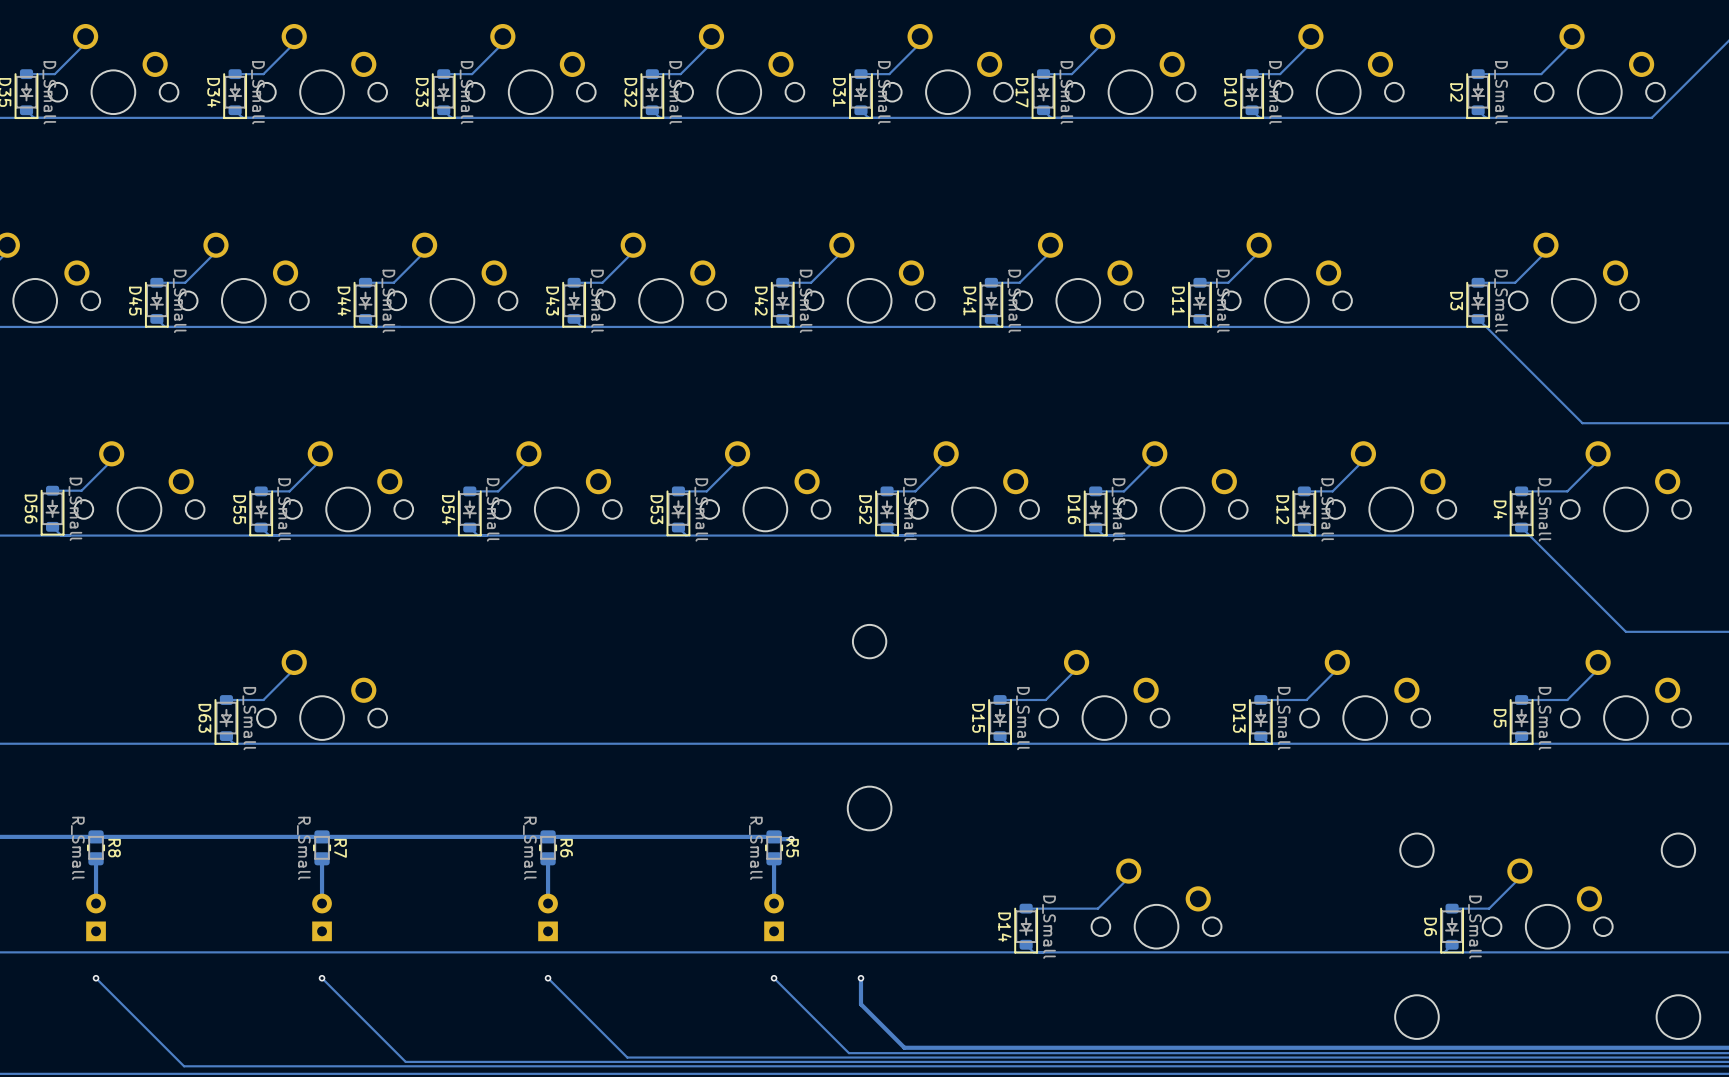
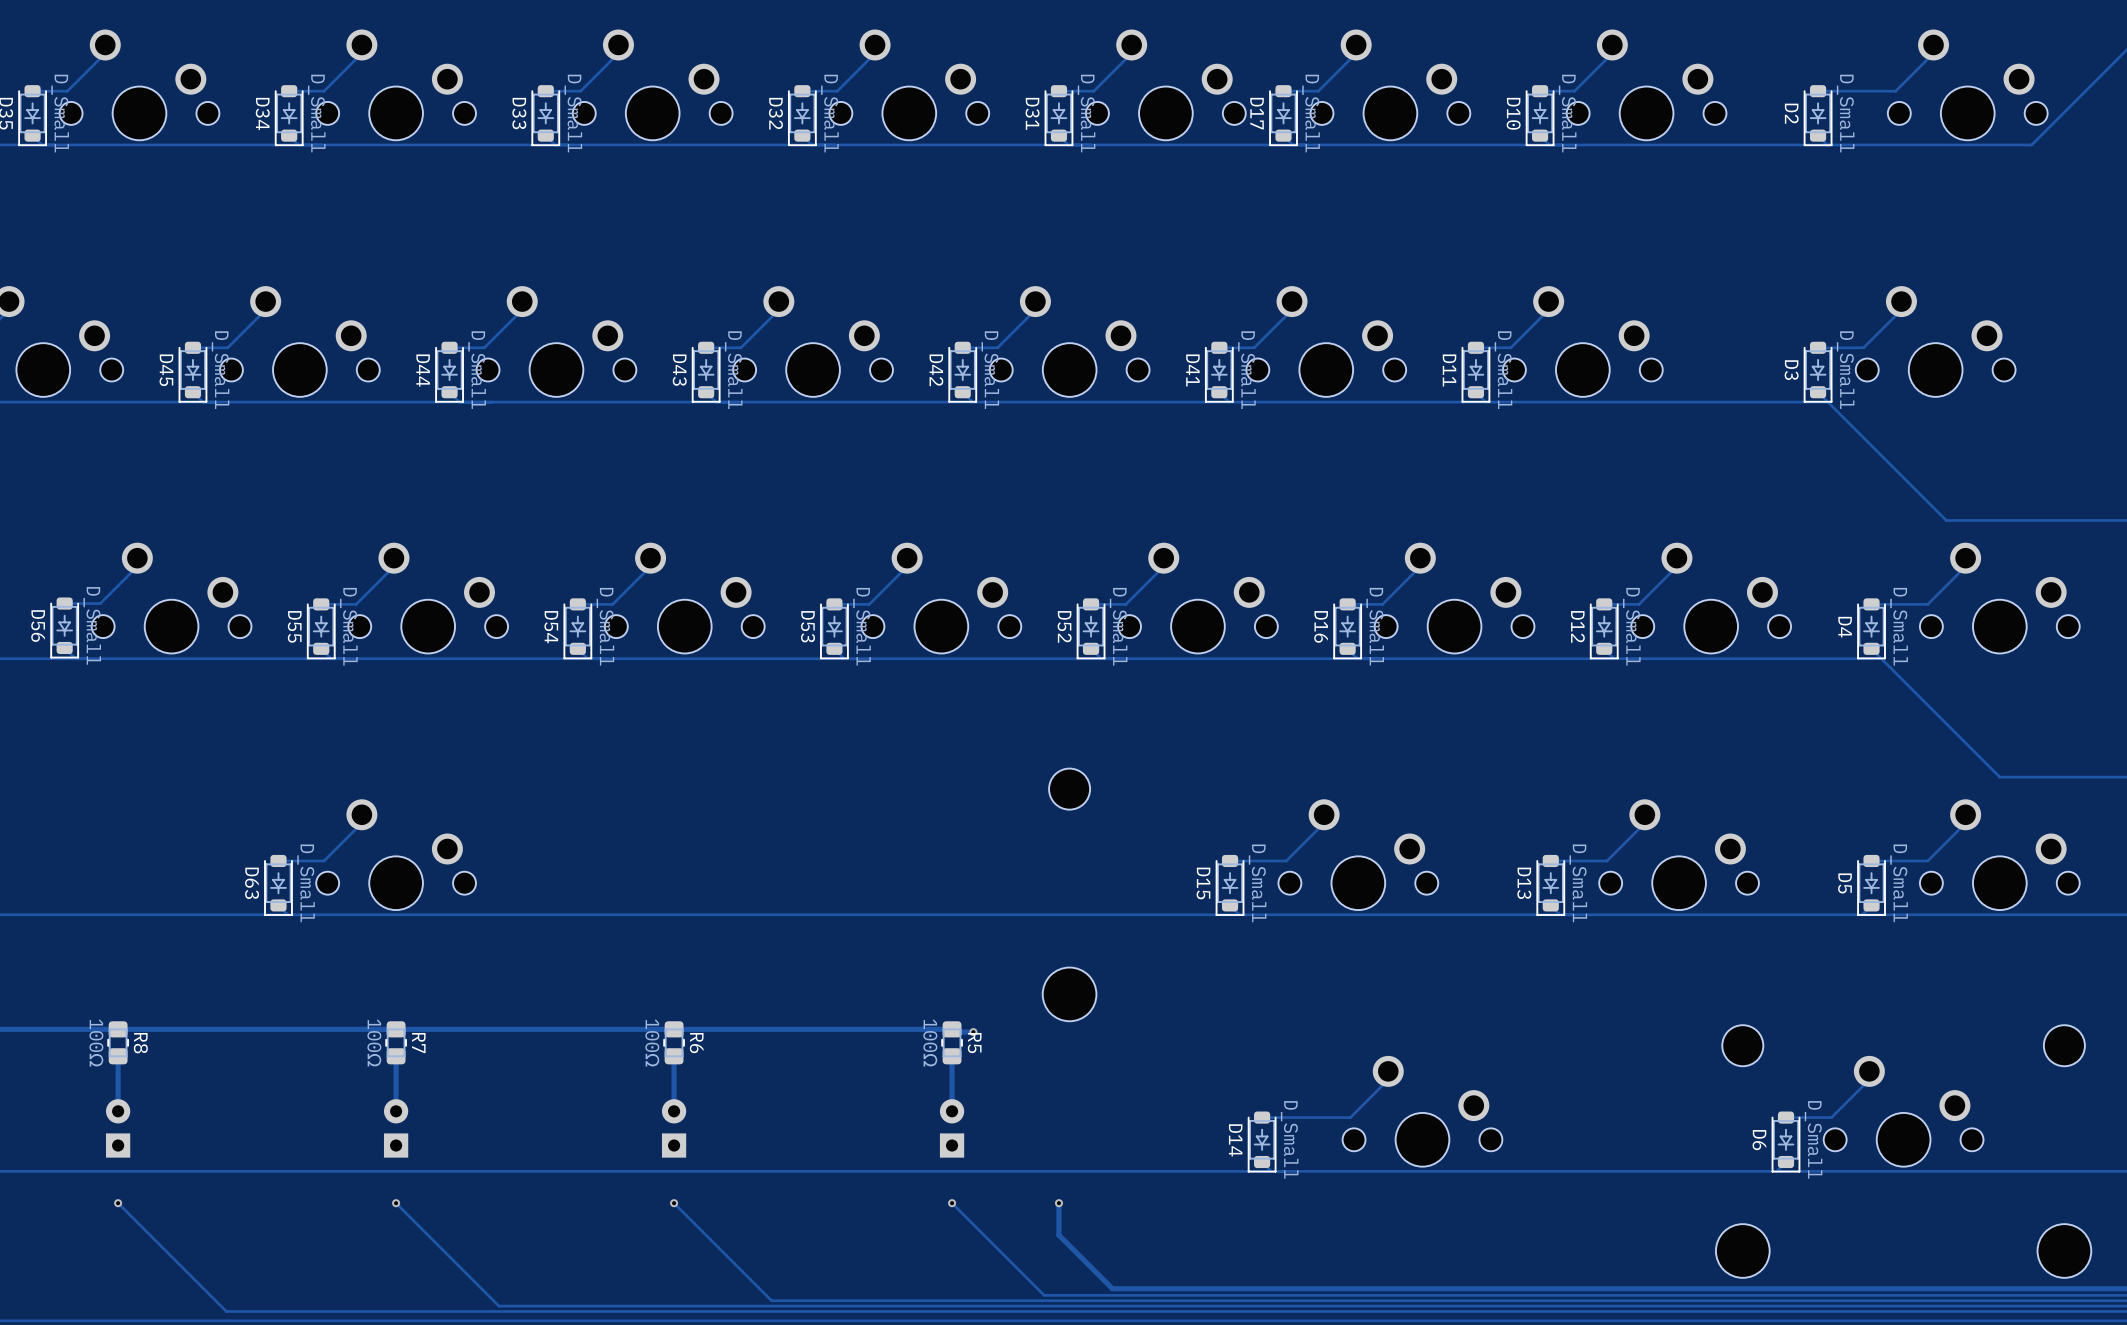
R8 value: R_Small (77, 848) -> 100Ω (96, 1042)
R7 value: R_Small (303, 848) -> 100Ω (374, 1042)
R6 value: R_Small (529, 848) -> 100Ω (652, 1042)
R5 value: R_Small (755, 848) -> 100Ω (930, 1042)

